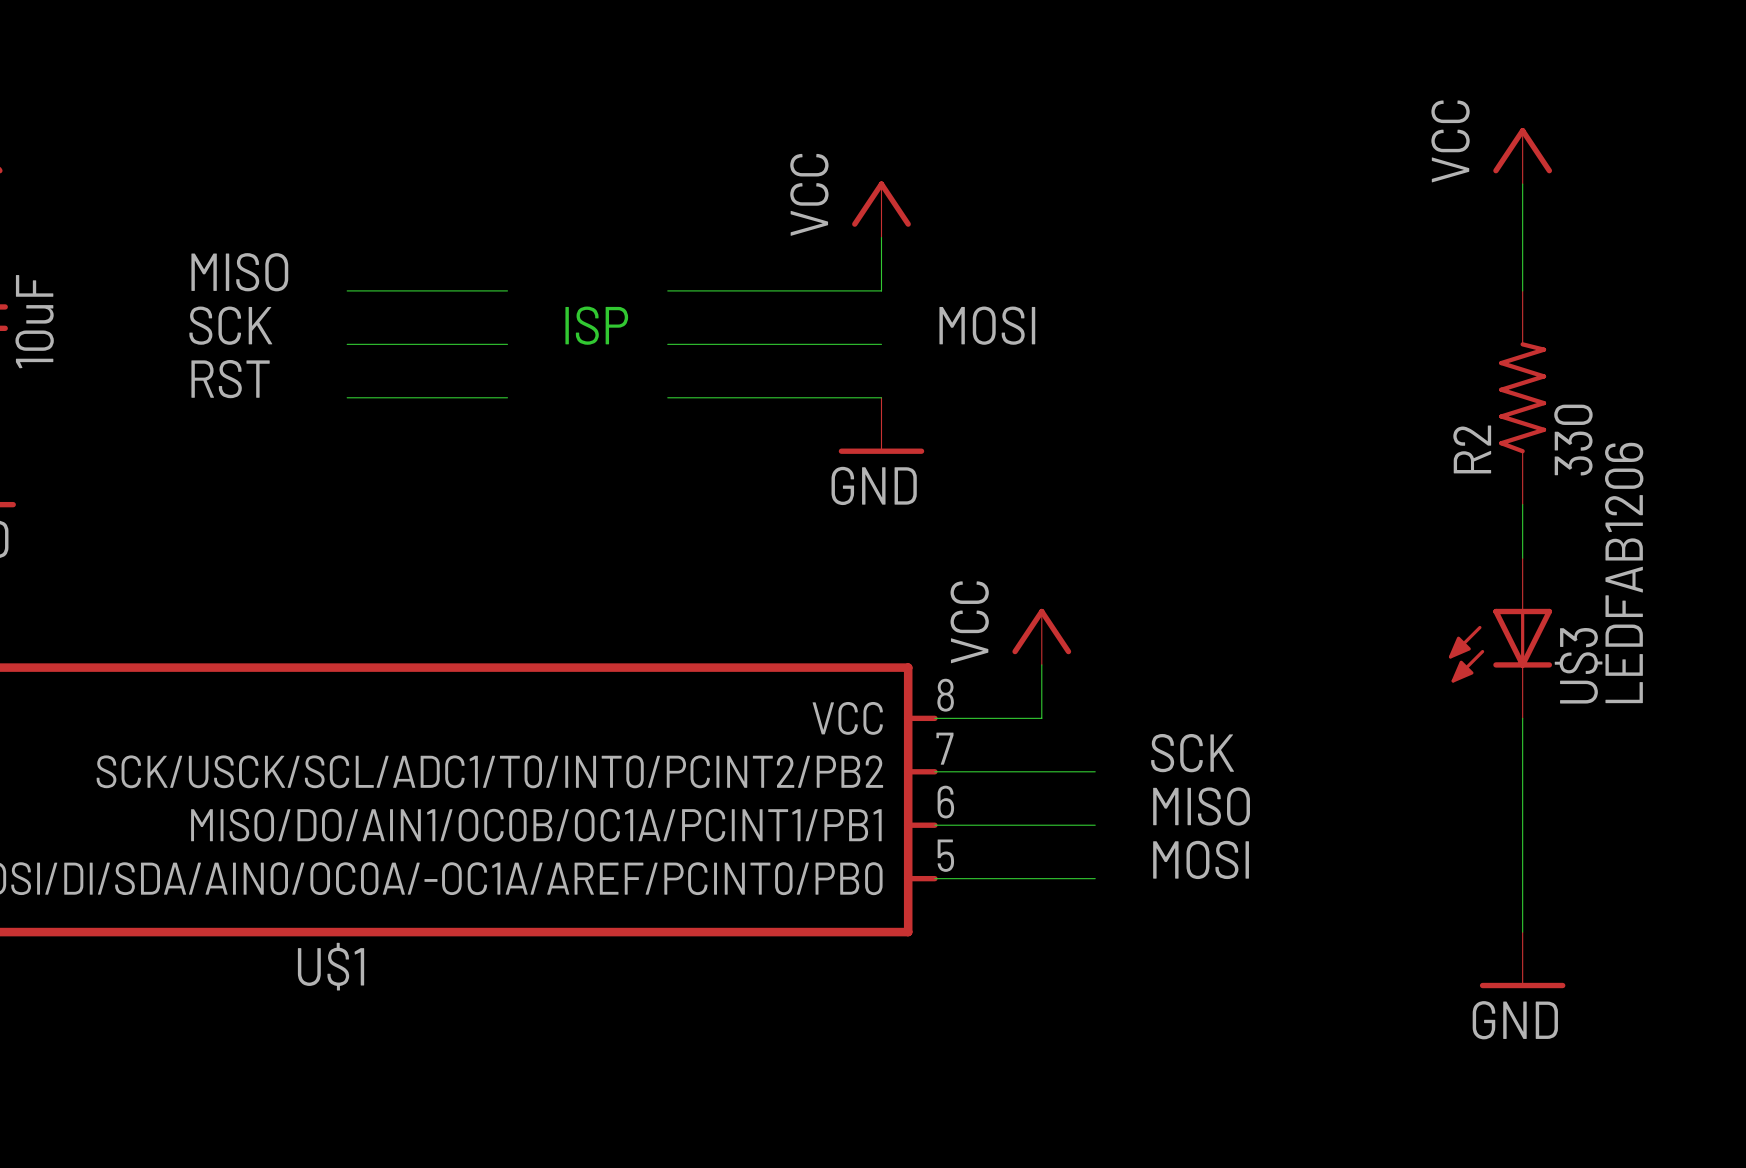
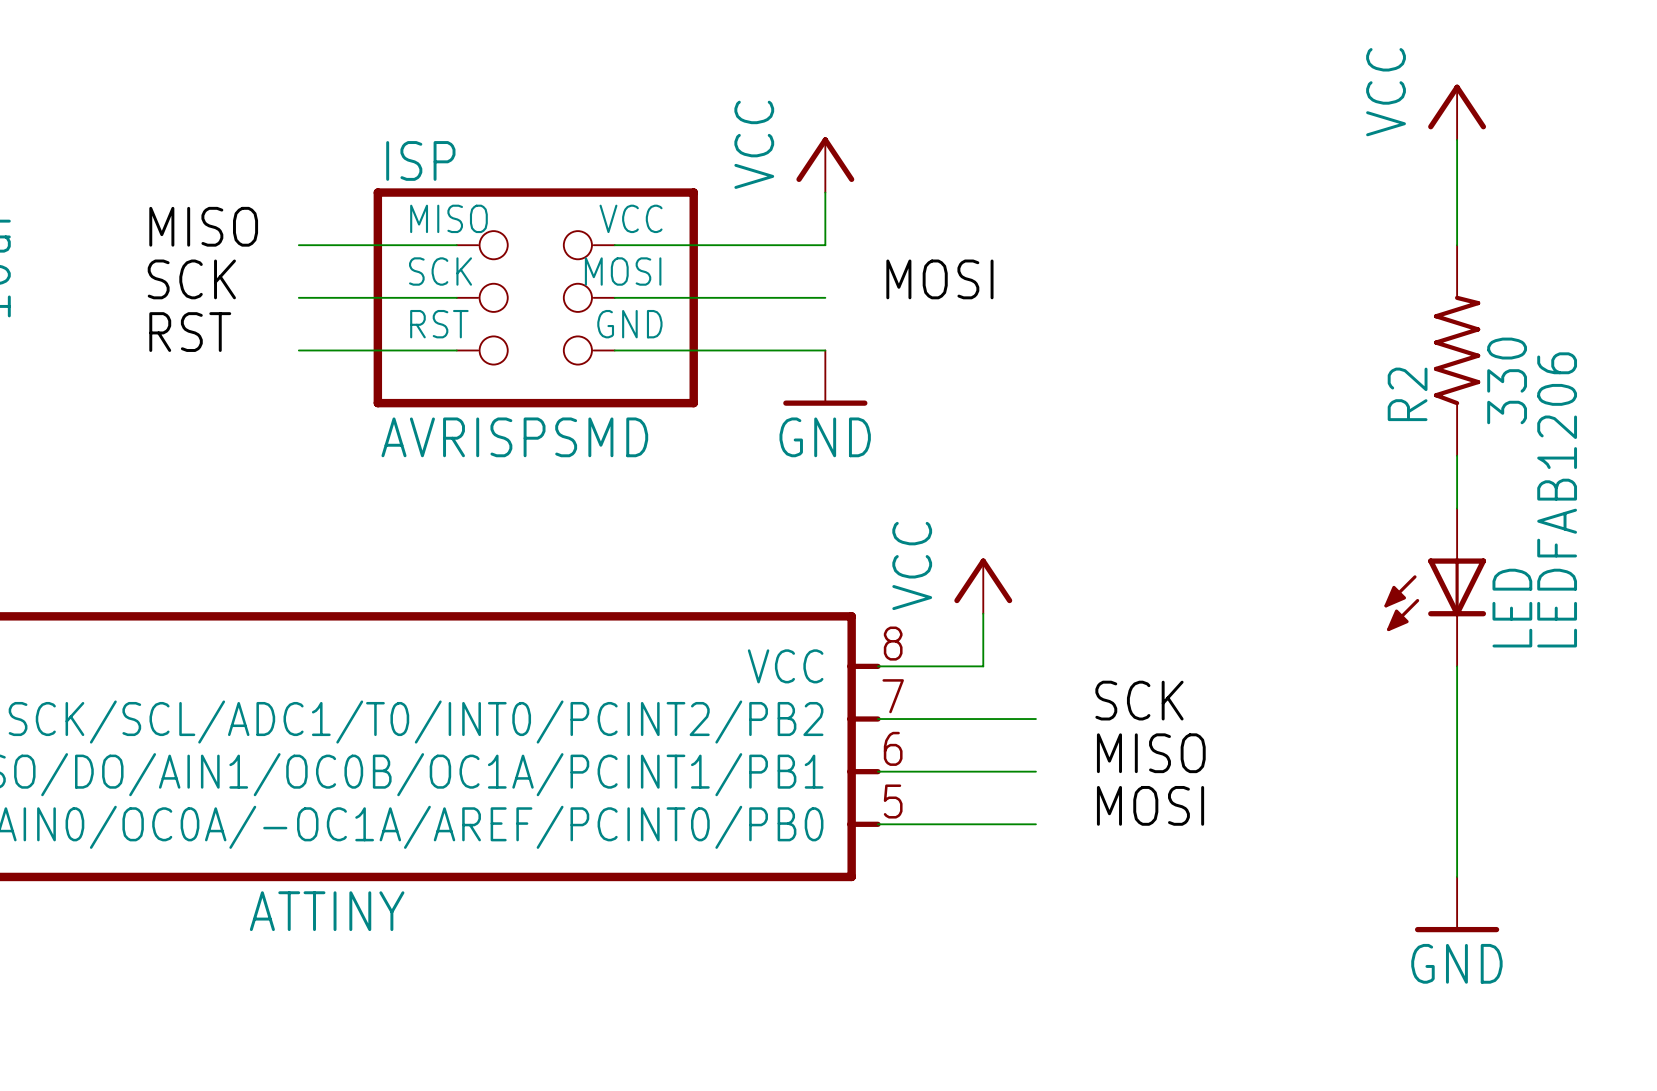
text: ISP (596, 325) -> none
ISP: none -> AVRISPSMD (535, 297)
U$3 name: U$3 (1578, 665) -> LED (1512, 608)
U$1 name: U$1 (331, 966) -> ATTINY (327, 911)

